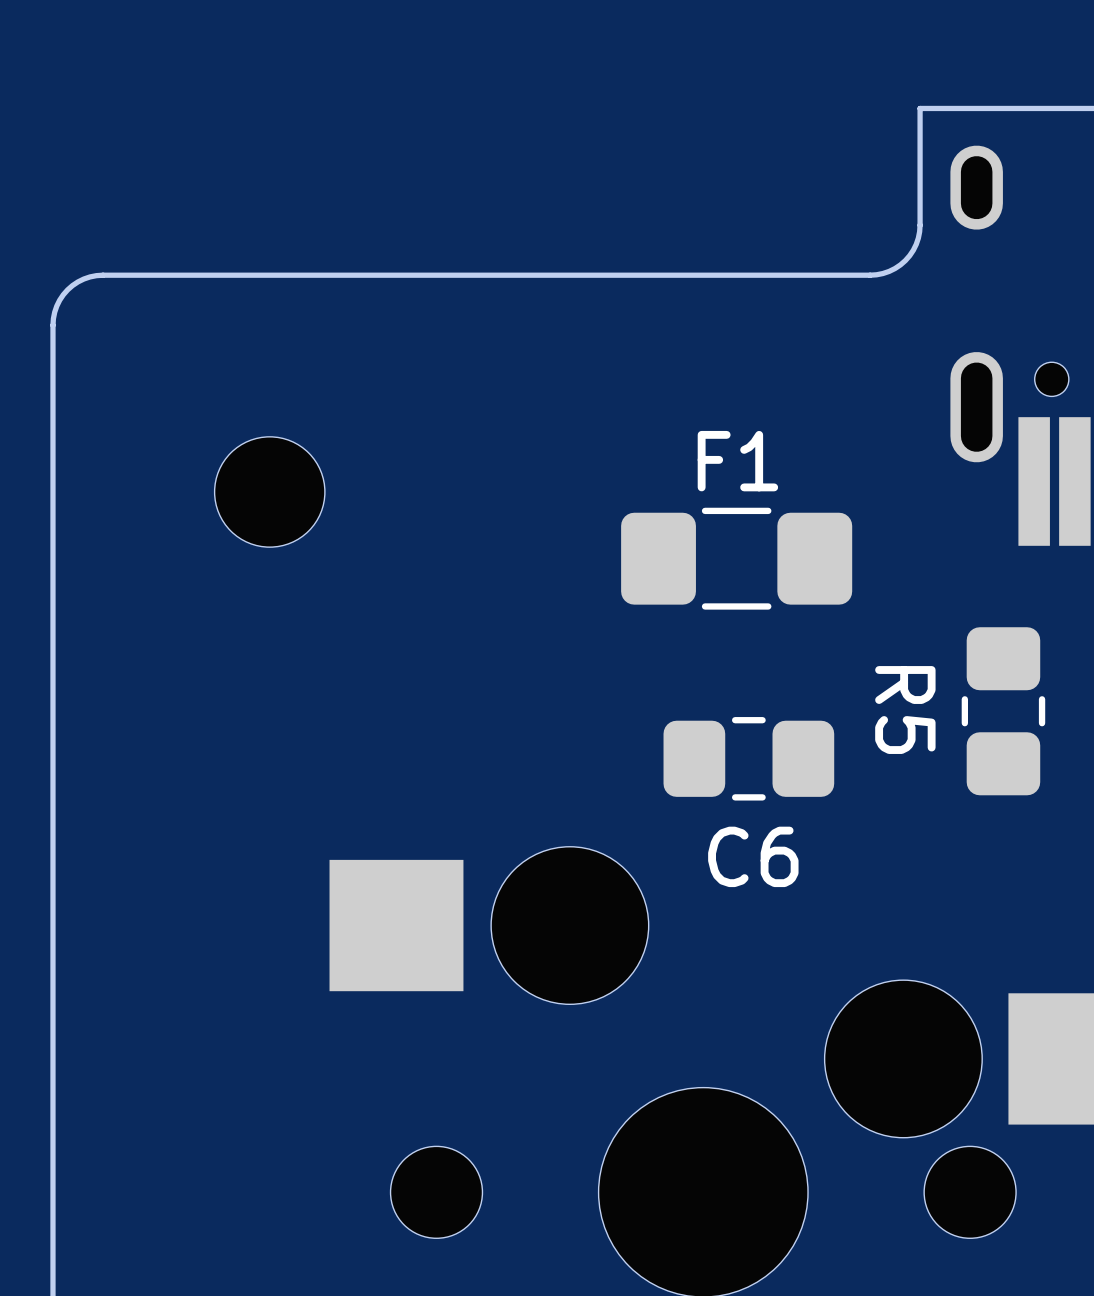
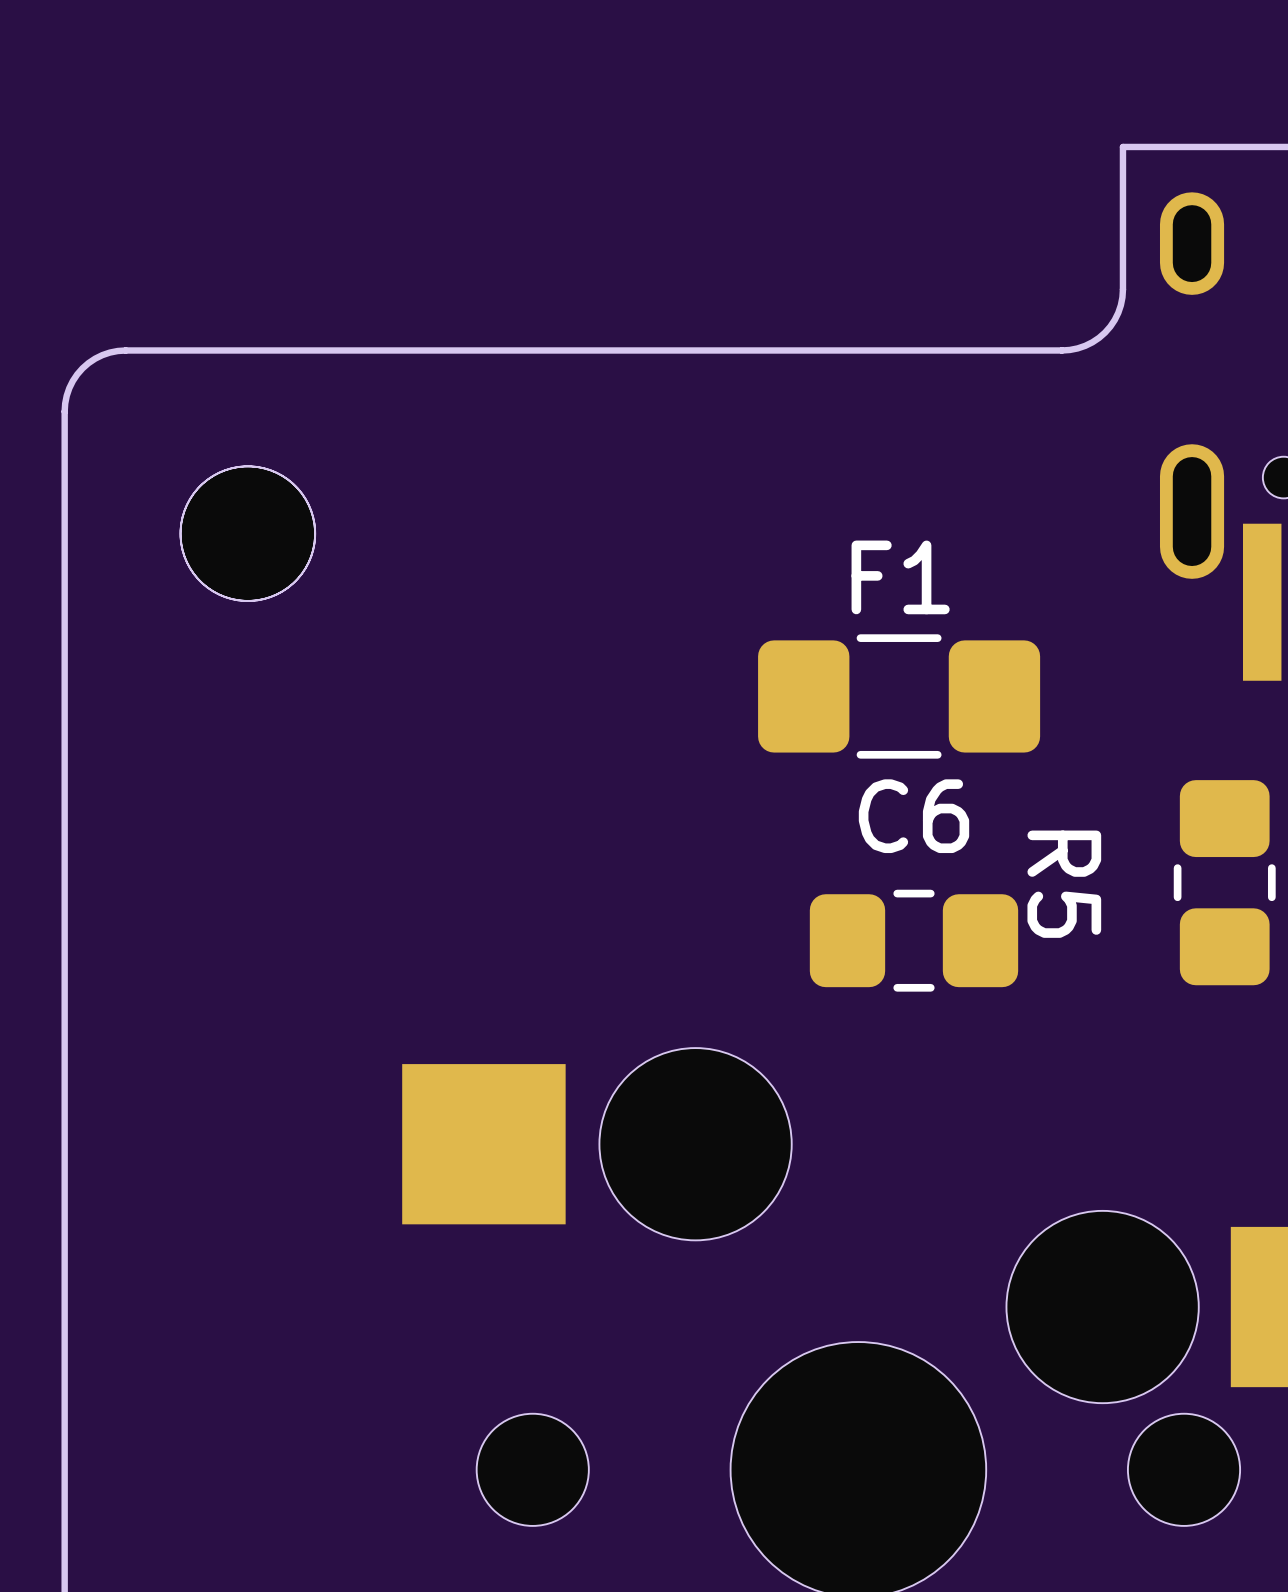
part position: (269, 491) -> (247, 533)
R5 name position: R5 (905, 710) -> R5 (1064, 884)
C6 name position: C6 (753, 856) -> C6 (913, 816)

